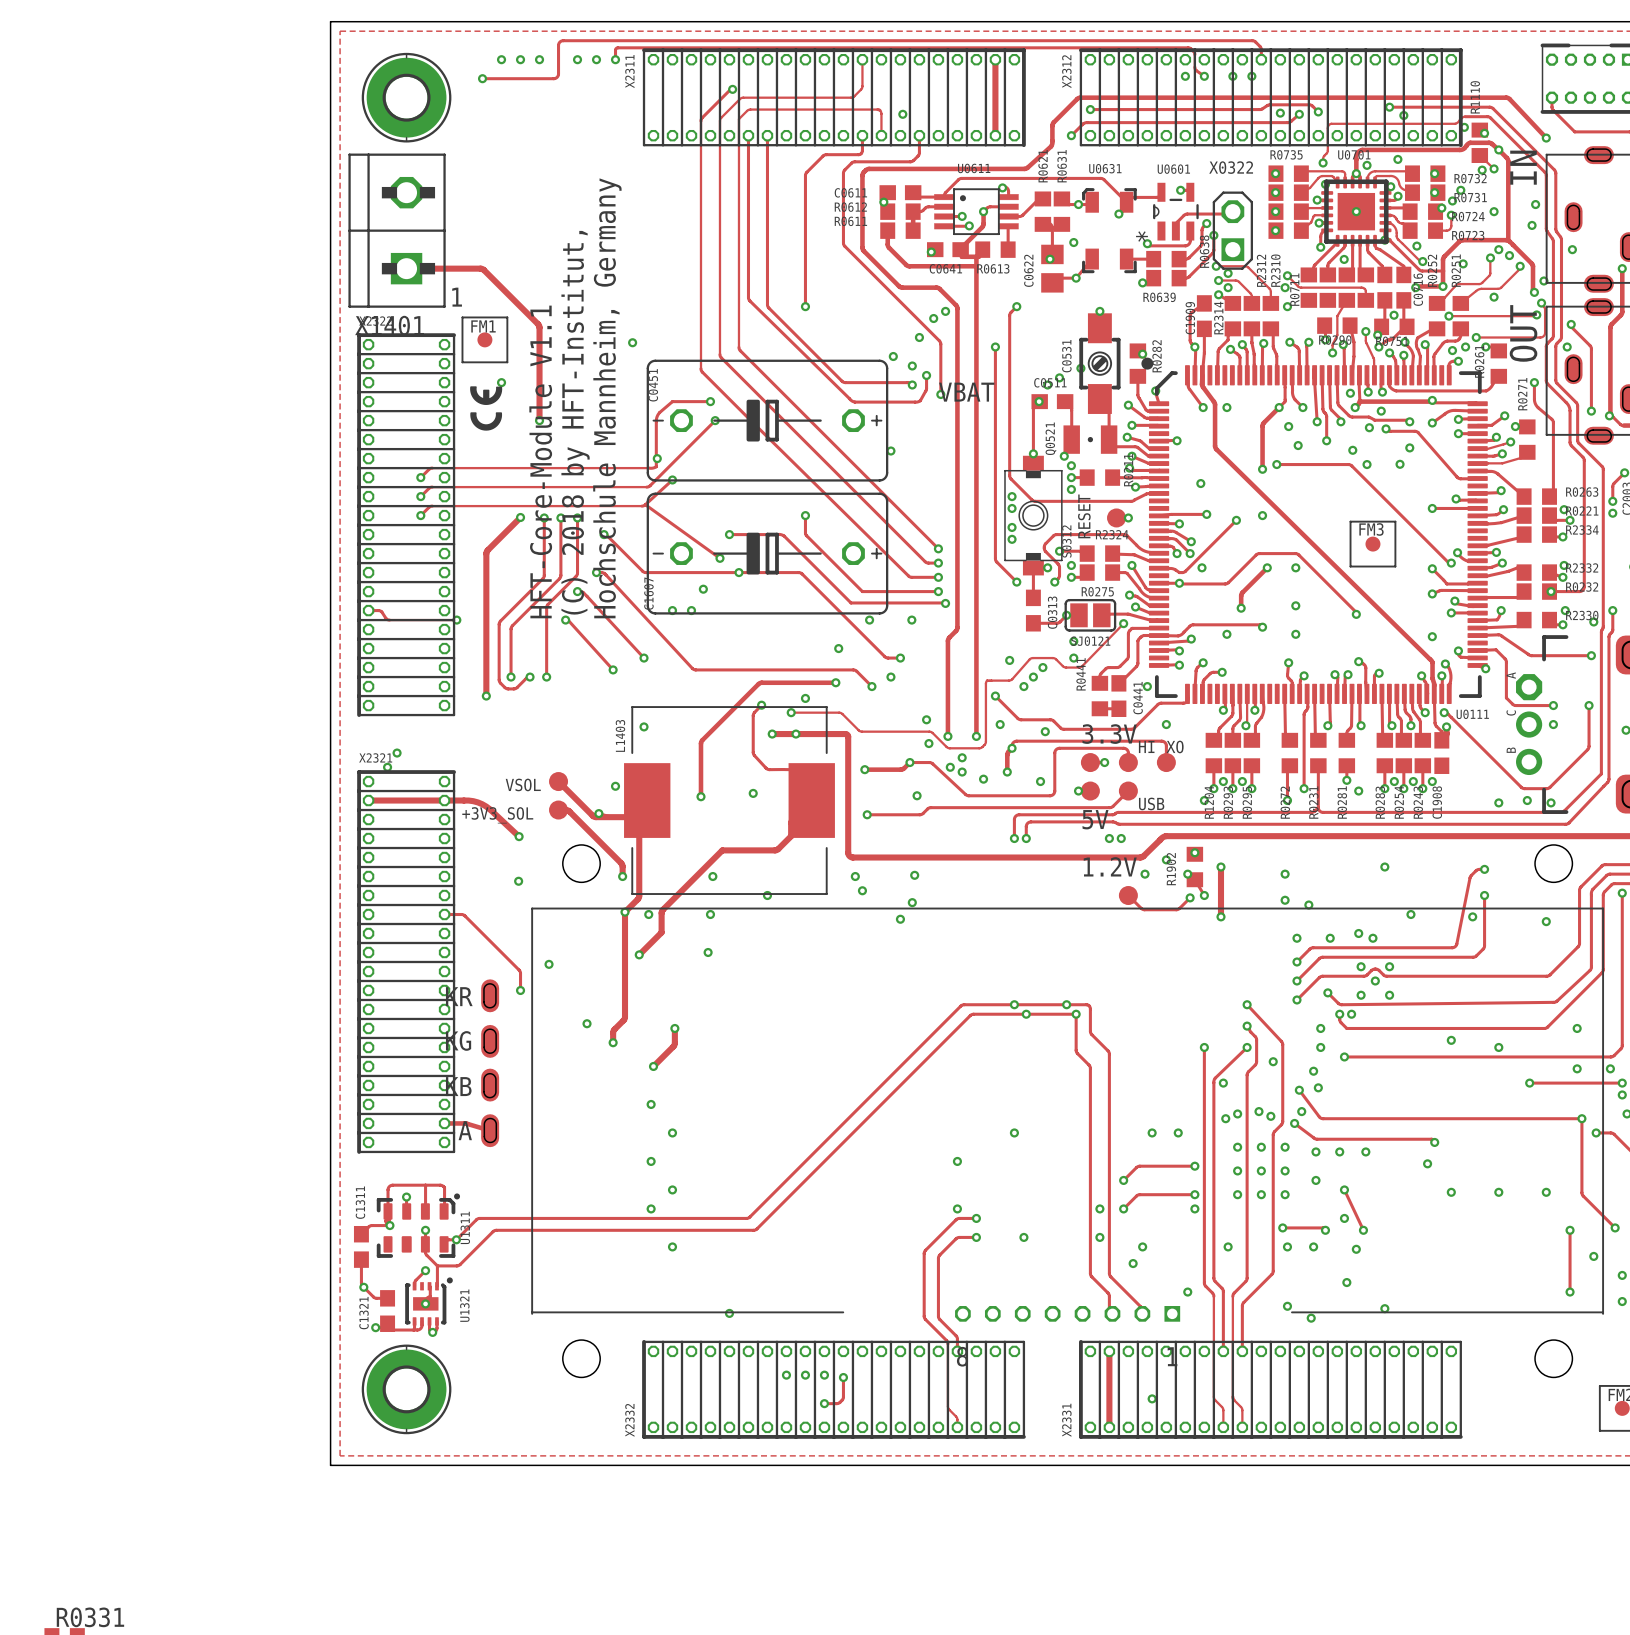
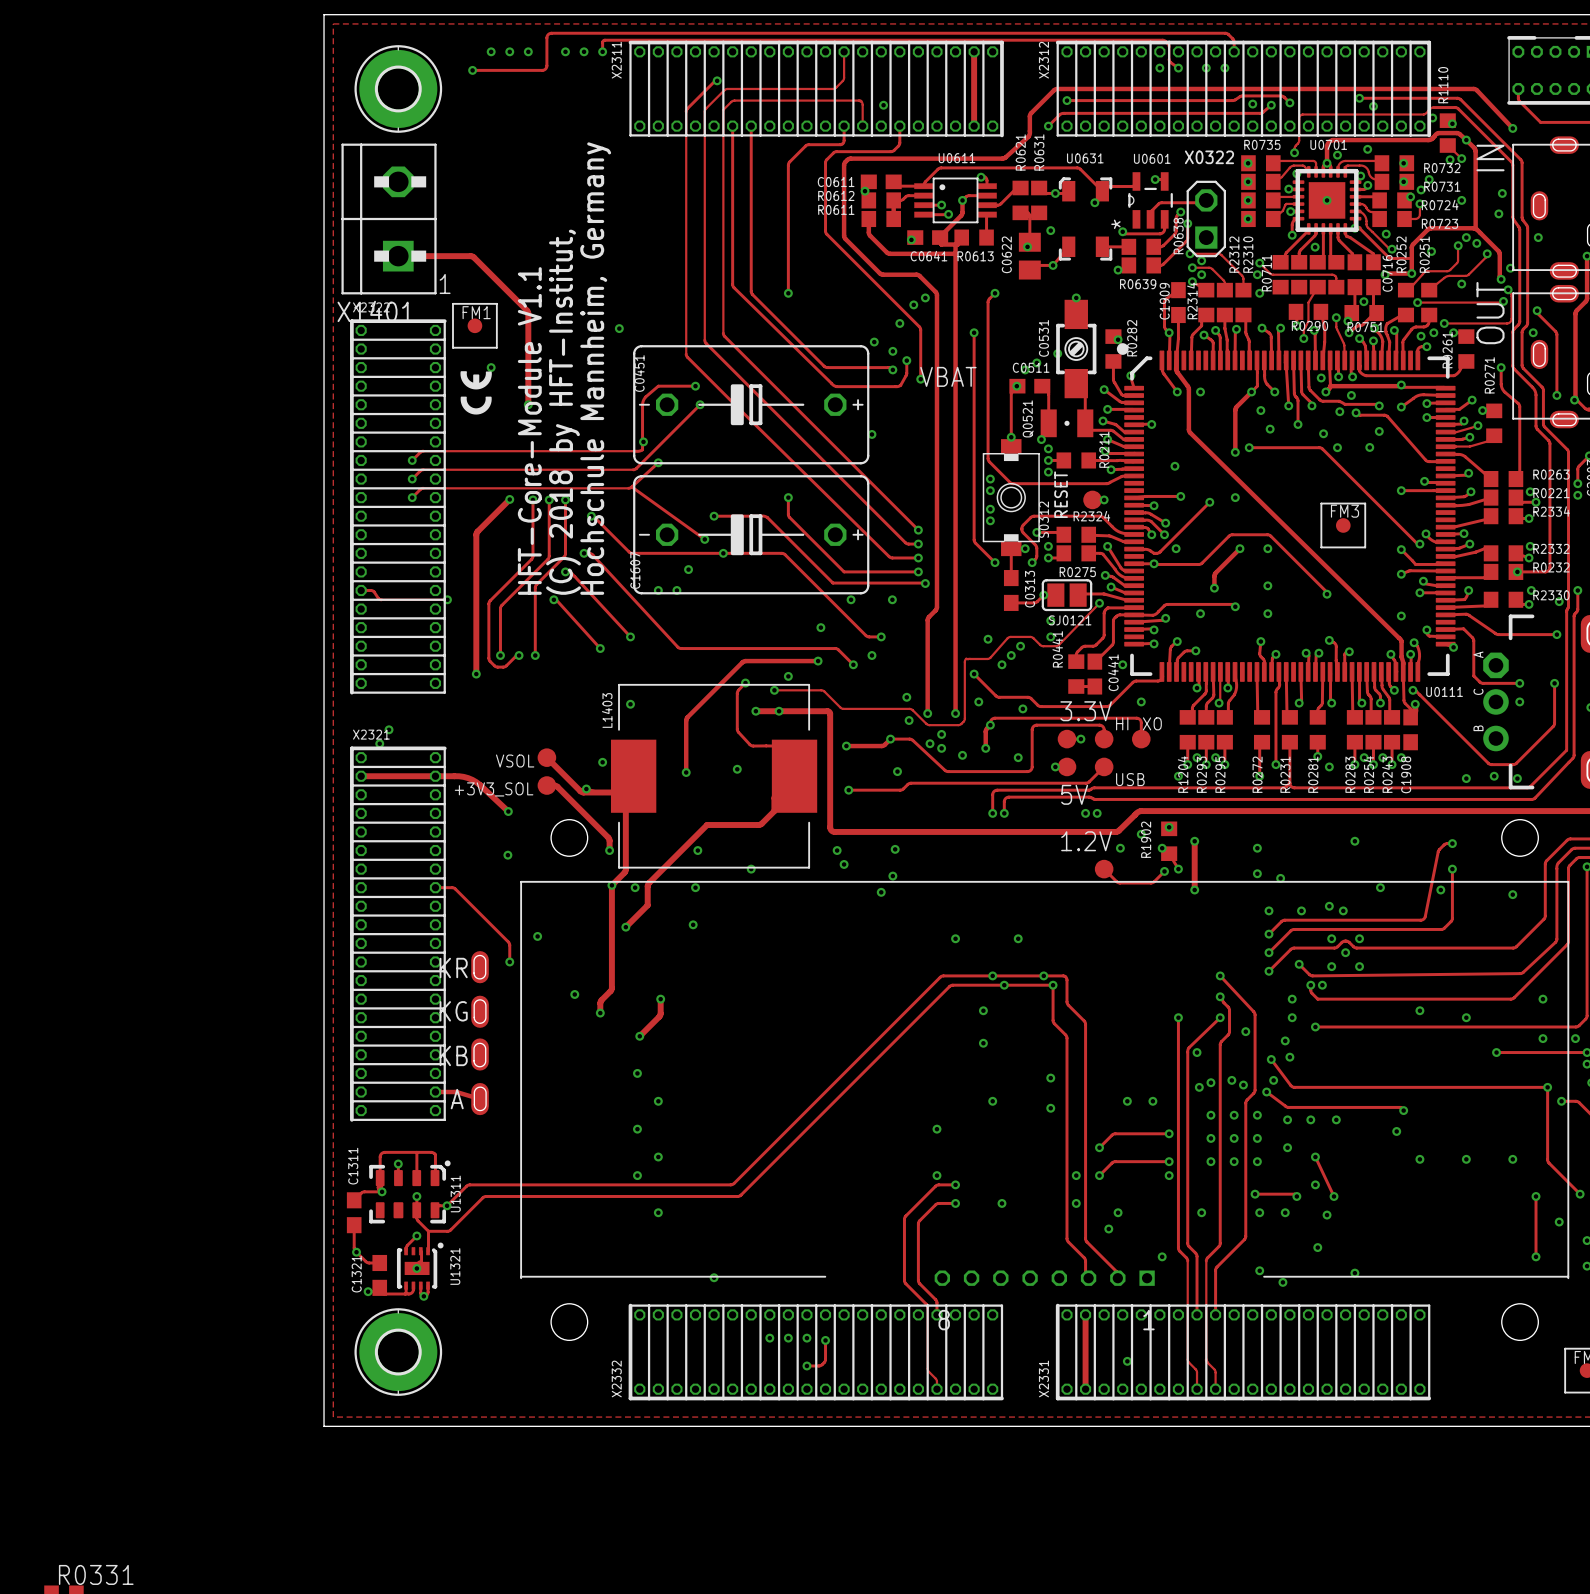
via: none -> (955, 938)
via: none -> (1018, 938)
via: none -> (983, 1010)
via: none -> (983, 1043)
via: none -> (1050, 1078)
via: none -> (1050, 1108)

